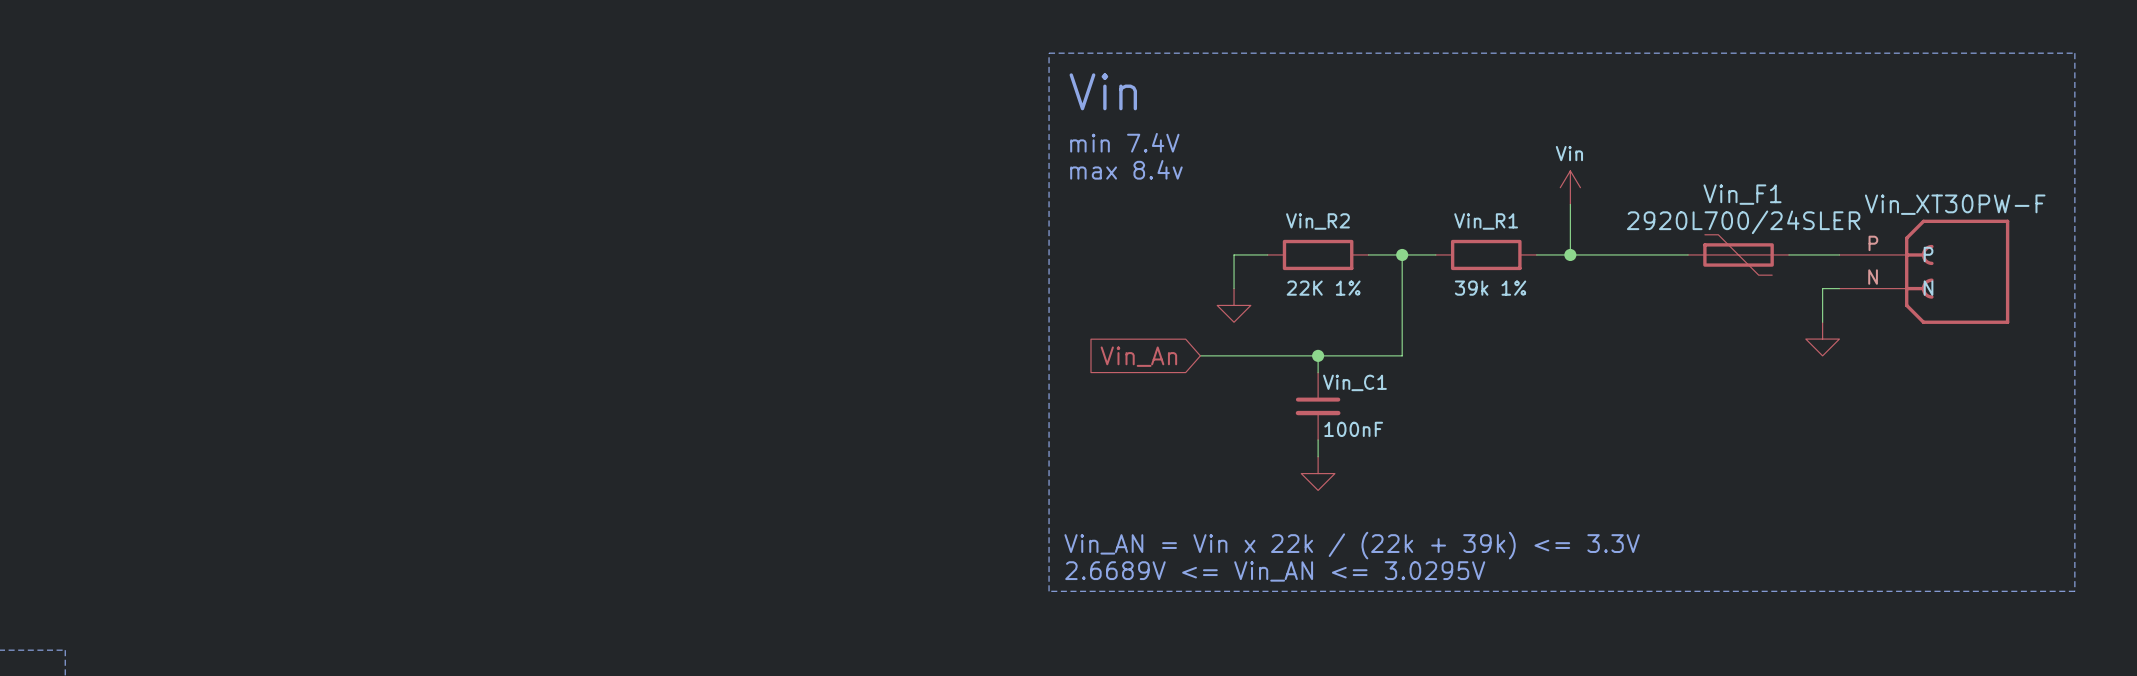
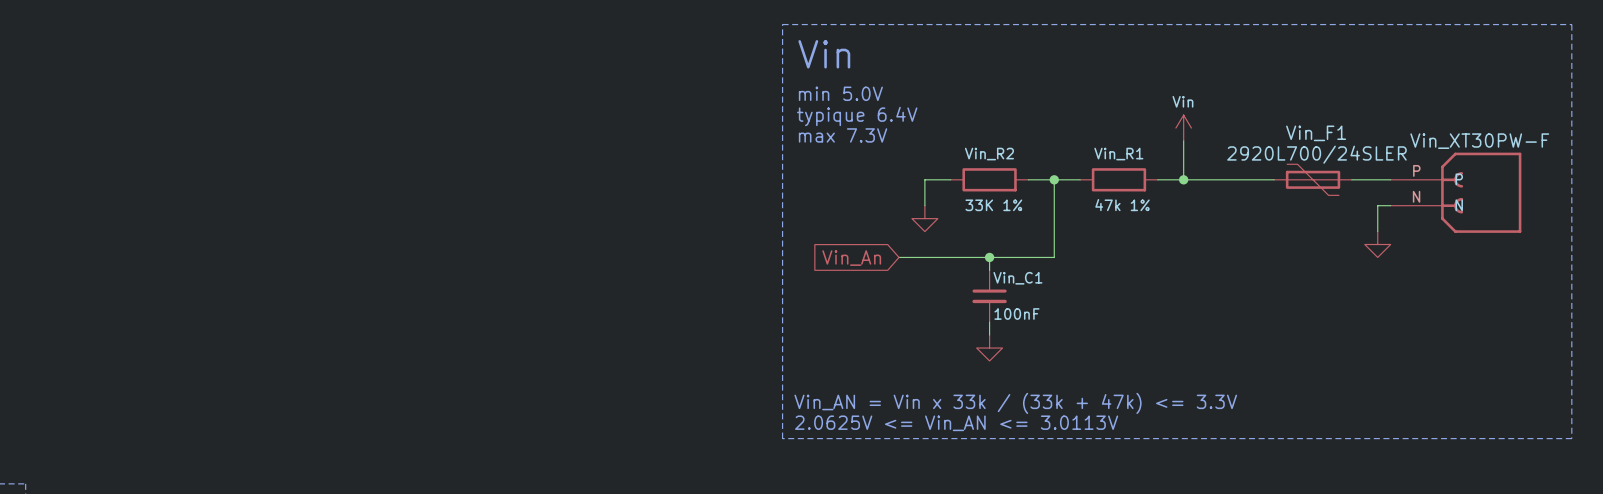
text: min 7.4V (1124, 142) -> min 5.0V (840, 93)
text: max 8.4v (1126, 169) -> typique 6.4V (857, 116)
text: none -> max 7.3V (843, 135)
Vin_R2 value: 22K 1% (1323, 288) -> 33K 1% (993, 205)
Vin_R1 value: 39k 1% (1490, 288) -> 47k 1% (1122, 205)
text: Vin_AN = Vin x 22k / (22k + 39k) <= 3.3V (1352, 545) -> Vin_AN = Vin x 33k / (33k + 47k) <= 3.3V (1015, 403)
text: 2.6689V <= Vin_AN <= 3.0295V (1275, 571) -> 2.0625V <= Vin_AN <= 3.0113V (956, 423)

